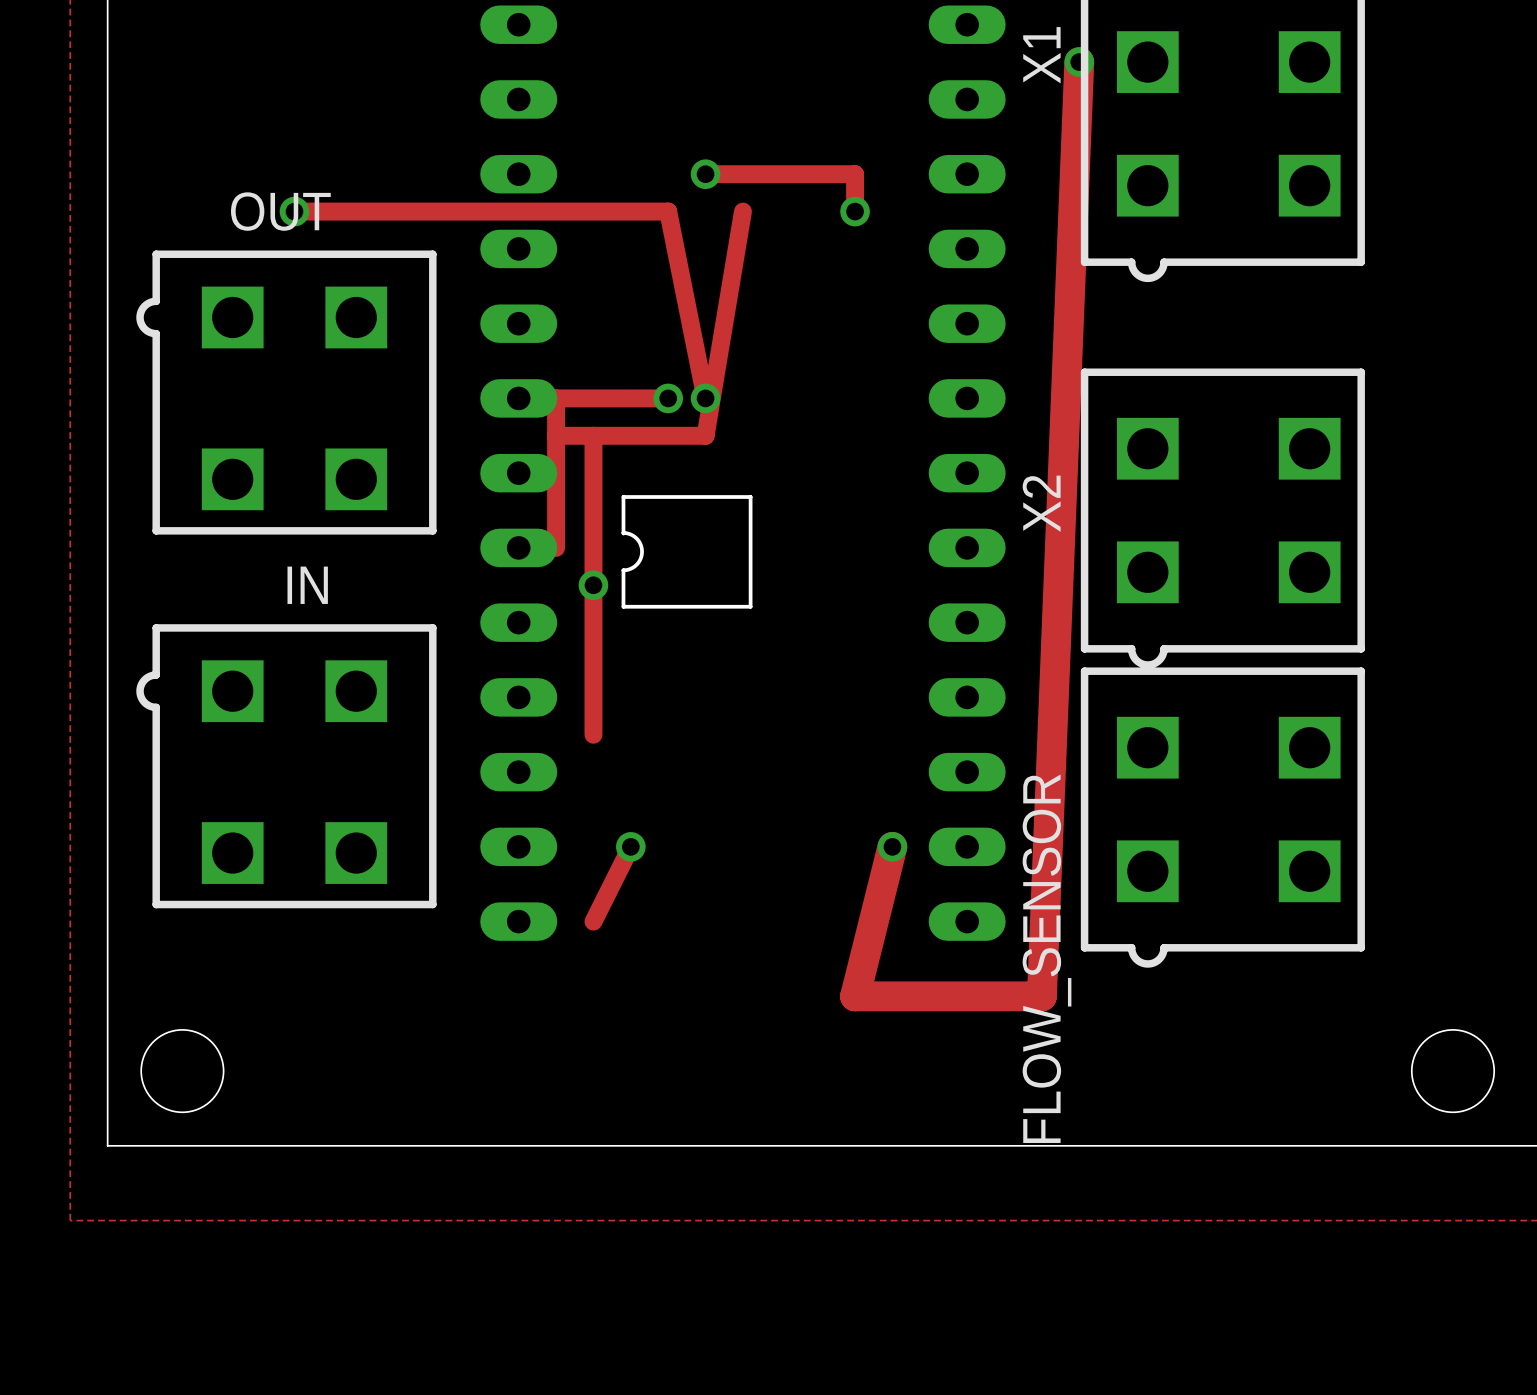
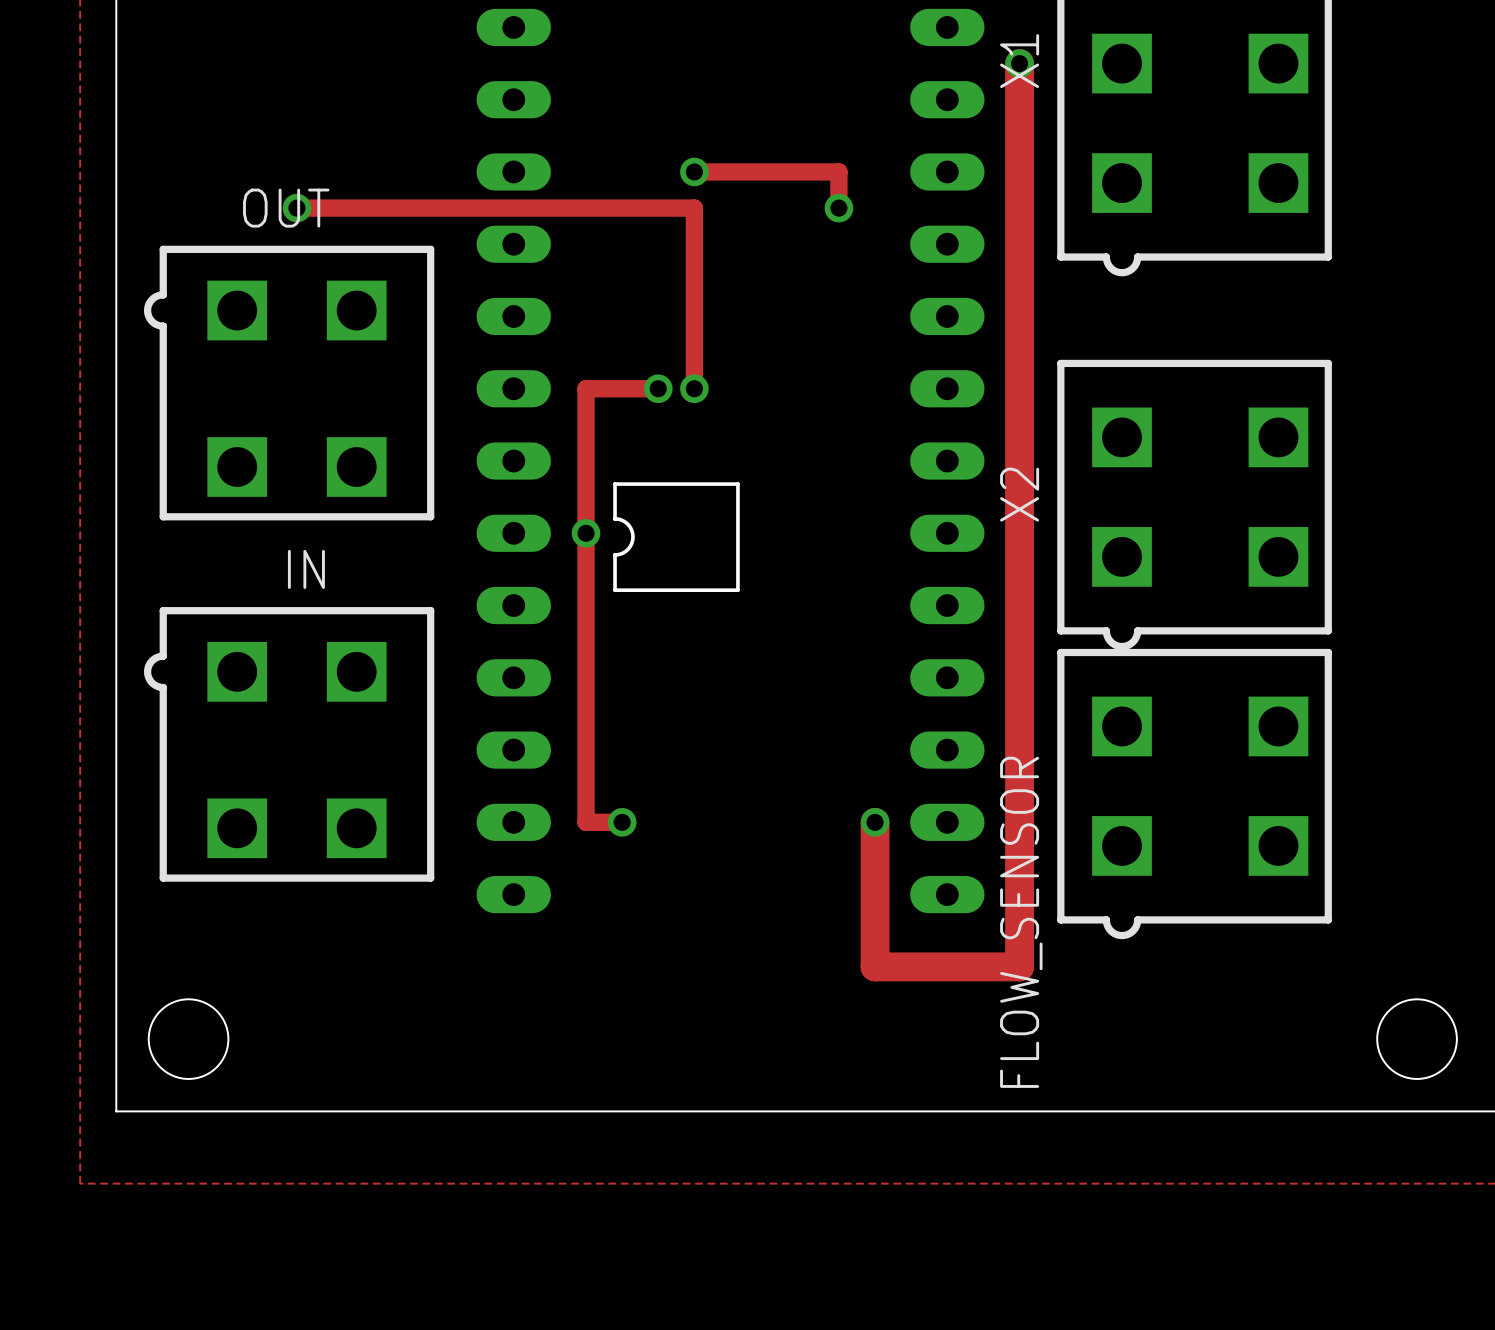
track: (1079, 62) (1041, 996) -> (1019, 63) (1019, 966)
via position: (1079, 62) -> (1019, 63)
track: (668, 211) (705, 398) -> (658, 208) (694, 208) (694, 388)
track: (742, 211) (705, 435) (556, 435) -> none
track: (593, 398) (556, 398) (556, 547) -> (586, 388) (586, 424)
via position: (593, 585) -> (586, 533)
track: (630, 846) (593, 921) -> (622, 822) (586, 822) (586, 713)
track: (892, 846) (855, 996) (892, 996) -> (875, 822) (875, 966)

